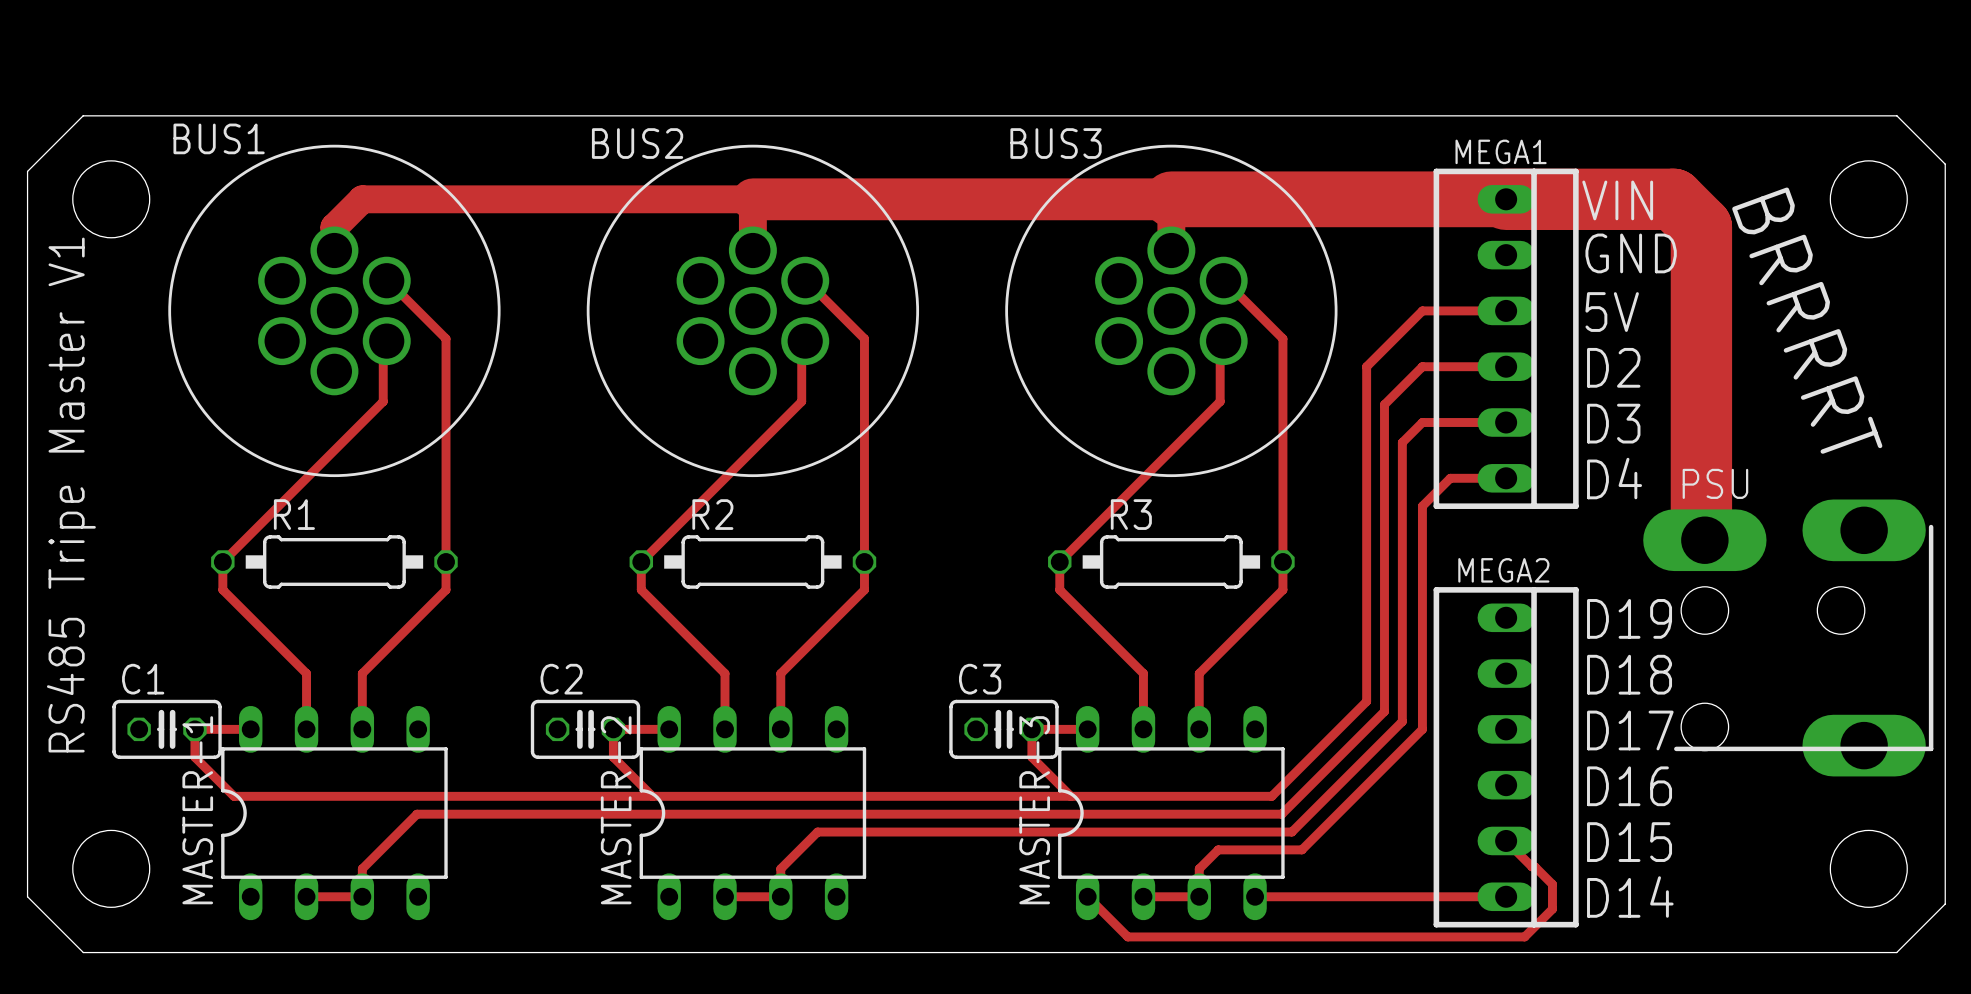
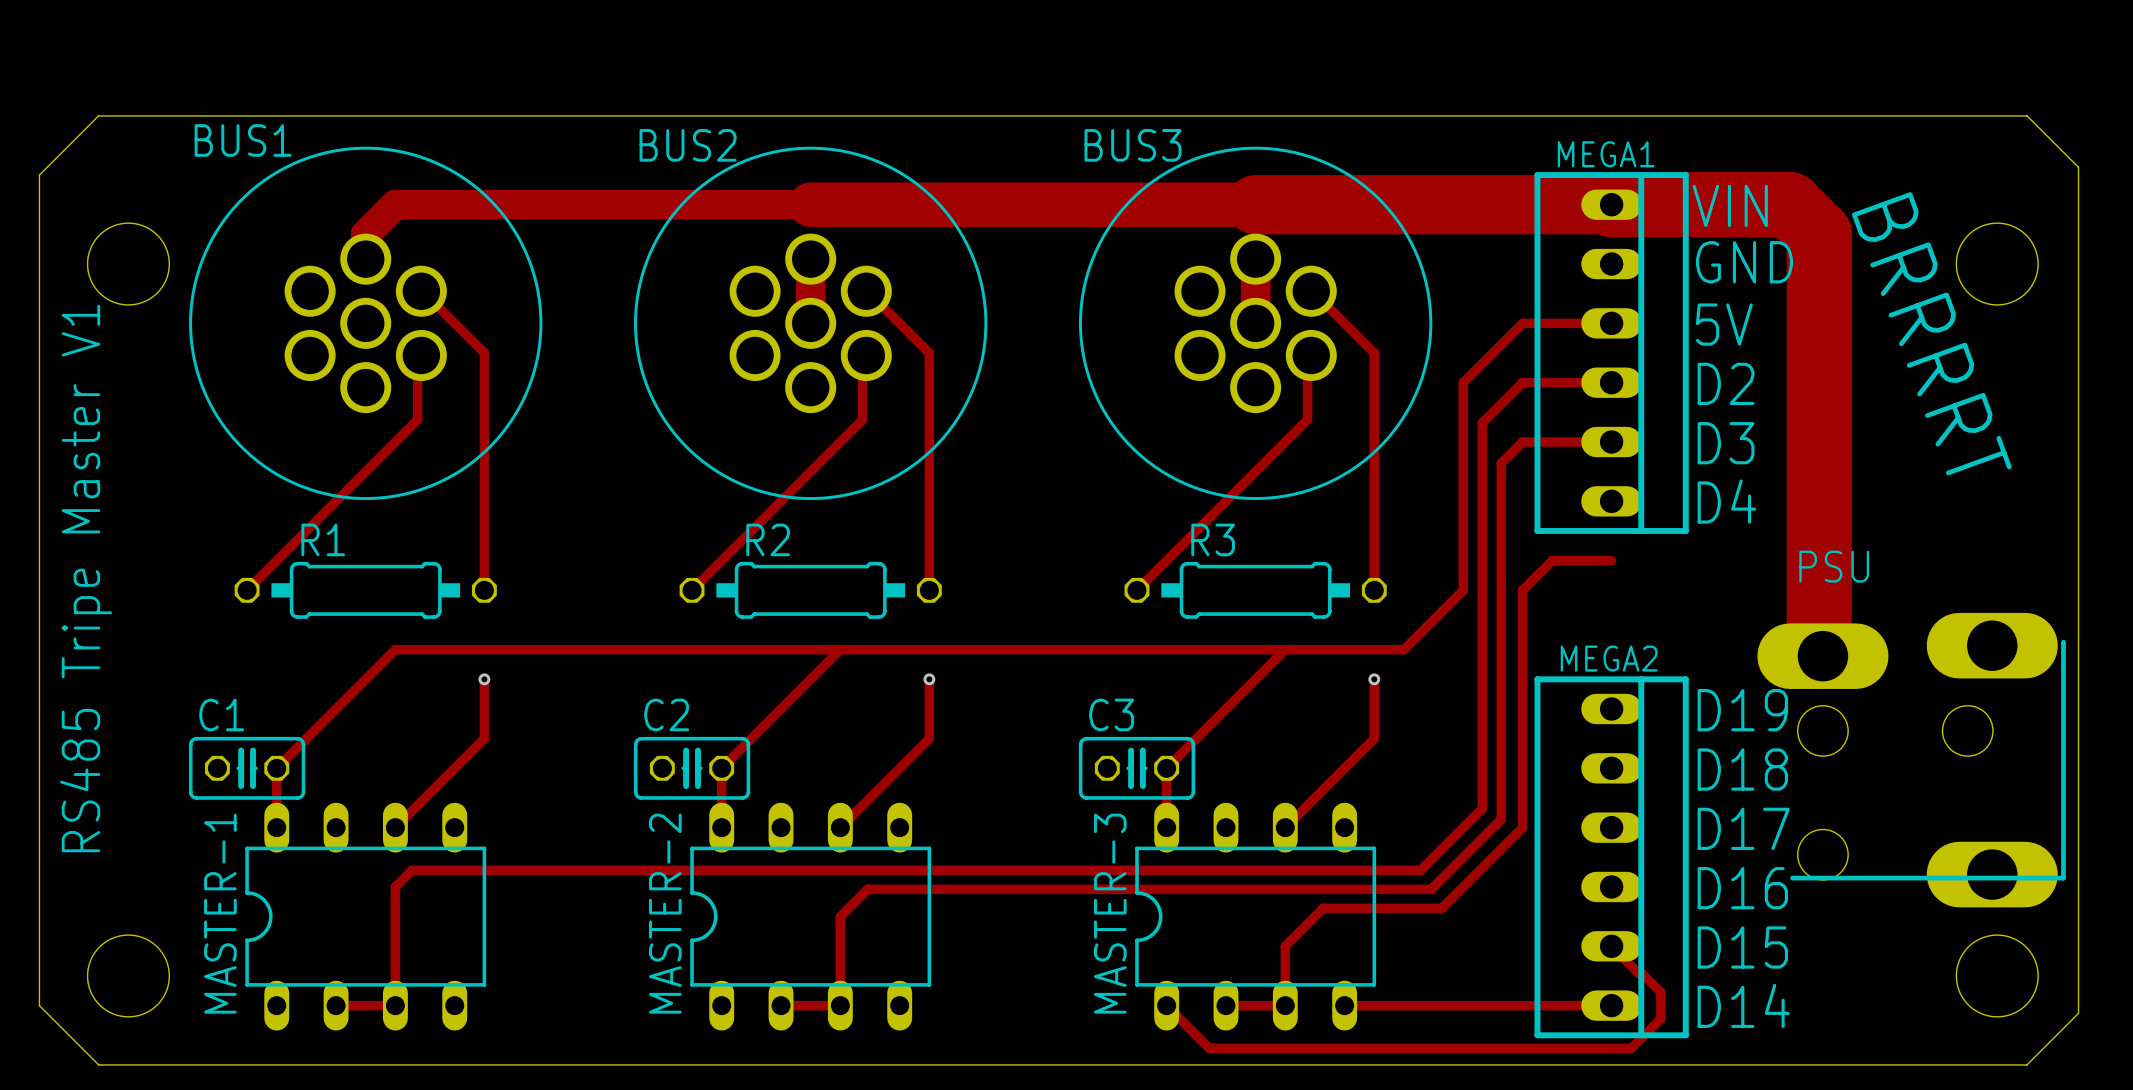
board edge: (1945, 164) (1896, 115) (83, 115) (27, 171) -> (2078, 226) (2078, 167) (2027, 115) (98, 115) (39, 175) (39, 234)
text position: VIN (1617, 200) -> VIN (1730, 205)
track: (1701, 227) (1673, 199) (362, 199) (334, 227) (334, 250) -> (1819, 293) (1819, 234) (1789, 204) (395, 204) (365, 234) (365, 259)
text position: GND (1631, 253) -> GND (1744, 262)
text: none -> 5V (1724, 324)
track: (386, 280) (446, 338) -> (421, 291) (484, 353) (484, 412)
track: (805, 280) (864, 338) -> (866, 291) (929, 353) (929, 412)
track: (1223, 280) (1282, 338) -> (1311, 291) (1374, 353) (1374, 412)
track: none -> (421, 355) (417, 360) (417, 419) (247, 590)
track: none -> (866, 355) (862, 360) (862, 419) (692, 590)
track: none -> (1311, 355) (1307, 360) (1307, 419) (1137, 590)
BUS1 position: (334, 310) -> (365, 323)
BUS2 position: (752, 310) -> (810, 323)
BUS3 position: (1171, 310) -> (1255, 323)
text: 5V (1612, 312) -> D2 (1726, 383)
text position: BRRRRT (1807, 320) -> BRRRRT (1931, 333)
MEGA1 position: (1506, 338) -> (1611, 353)
track: (386, 341) (383, 345) (383, 401) (222, 561) (222, 589) (306, 673) (306, 729) -> none
track: (805, 341) (801, 345) (801, 401) (641, 561) (641, 589) (724, 673) (724, 729) -> none
track: (1223, 341) (1220, 345) (1220, 401) (1059, 561) (1059, 589) (1143, 673) (1143, 729) -> none
track: (1384, 348) (1366, 366) -> (1611, 323) (1522, 323) (1463, 382) (1463, 442)
text: D2 (1613, 367) -> D3 (1726, 443)
track: (1402, 386) (1384, 404) -> (1482, 423) (1482, 482)
track: (1506, 422) (1422, 422) (1402, 442) -> (1501, 463) (1501, 522)
text: D3 (1613, 423) -> D4 (1726, 501)
text: D4 (1614, 478) -> none
track: (446, 506) (446, 589) (362, 673) (362, 729) -> (484, 679) (484, 738) (395, 827)
track: (864, 506) (864, 589) (780, 673) (780, 729) -> (929, 679) (929, 738) (840, 827)
track: (1282, 506) (1282, 589) (1199, 673) (1199, 729) -> (1374, 679) (1374, 738) (1285, 827)
track: (1366, 506) (1366, 701) (1271, 796) (233, 796) (194, 757) (194, 729) (250, 729) -> (1463, 590) (1403, 649) (395, 649) (276, 768) (276, 827)
R1 position: (334, 561) -> (365, 590)
R2 position: (752, 561) -> (810, 590)
R3 position: (1171, 561) -> (1255, 590)
via: none -> (484, 679)
via: none -> (929, 679)
via: none -> (1374, 679)
PSU position: (1788, 637) -> (1911, 760)
C1 position: (167, 729) -> (247, 768)
C2 position: (585, 729) -> (692, 768)
track: (669, 729) (613, 729) (613, 757) (652, 796) -> (721, 827) (721, 768) (840, 649)
C3 position: (1003, 729) -> (1137, 768)
track: (1087, 729) (1031, 729) (1031, 757) (1070, 796) -> (1166, 827) (1166, 768) (1285, 649)
track: (1326, 769) (1281, 814) (417, 814) (362, 868) -> (1420, 870) (412, 870) (395, 886) (395, 975)
track: (1336, 787) (1291, 832) (817, 832) (780, 868) -> (1431, 889) (867, 889) (840, 916) (840, 975)
track: (1346, 805) (1301, 849) (1218, 849) (1199, 868) -> (1441, 908) (1323, 908) (1285, 946) (1285, 975)

